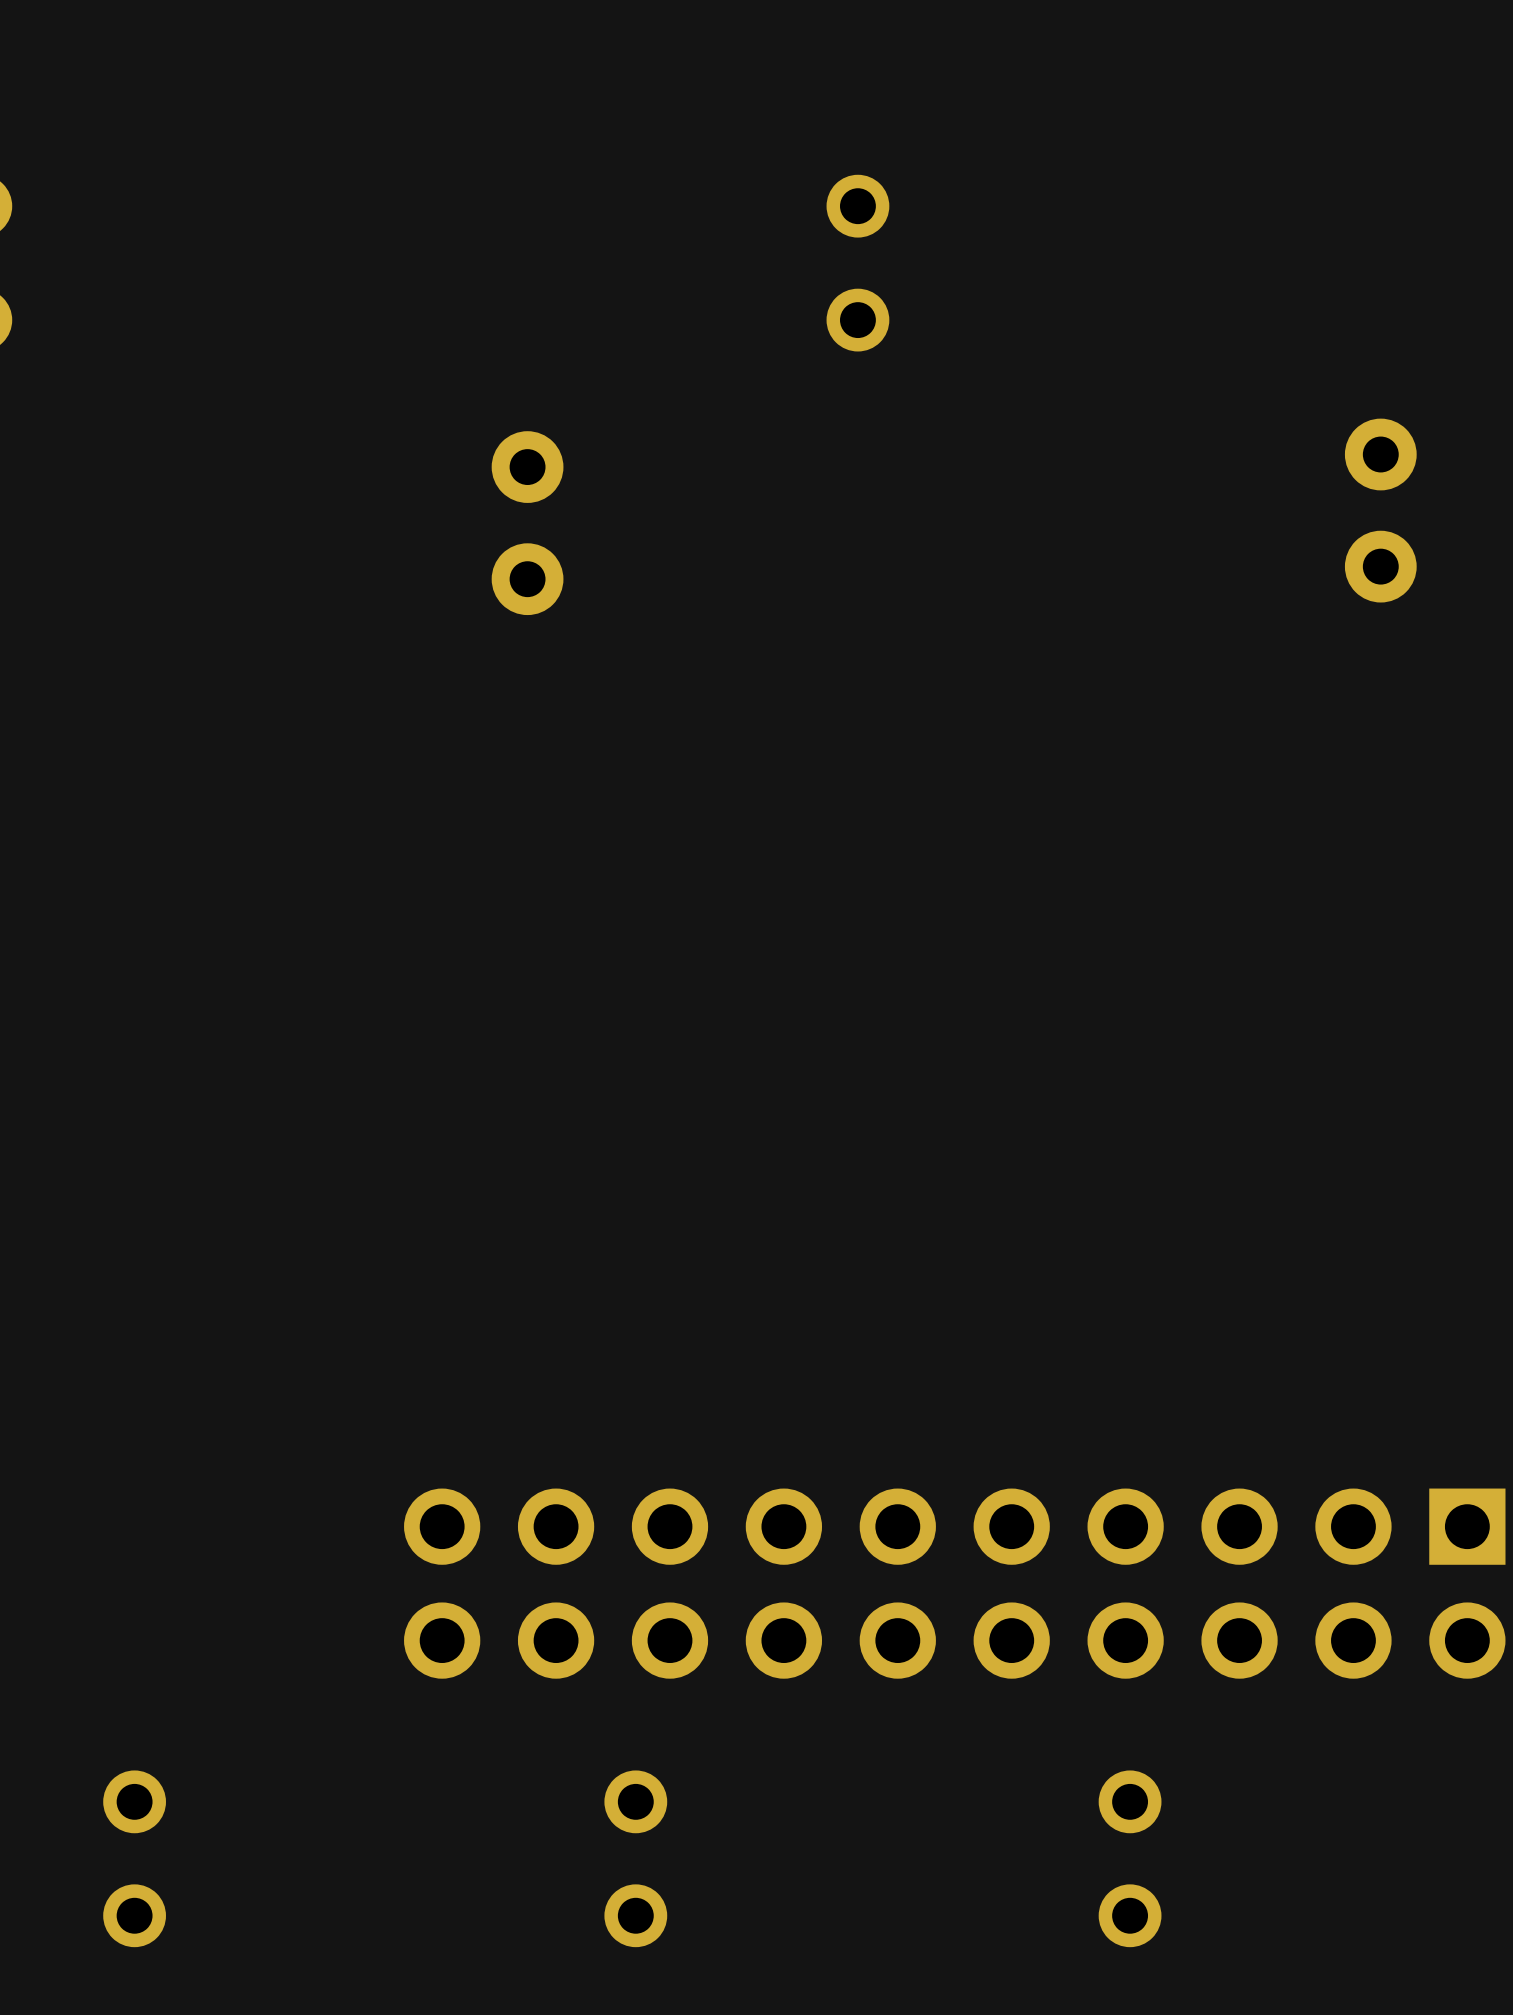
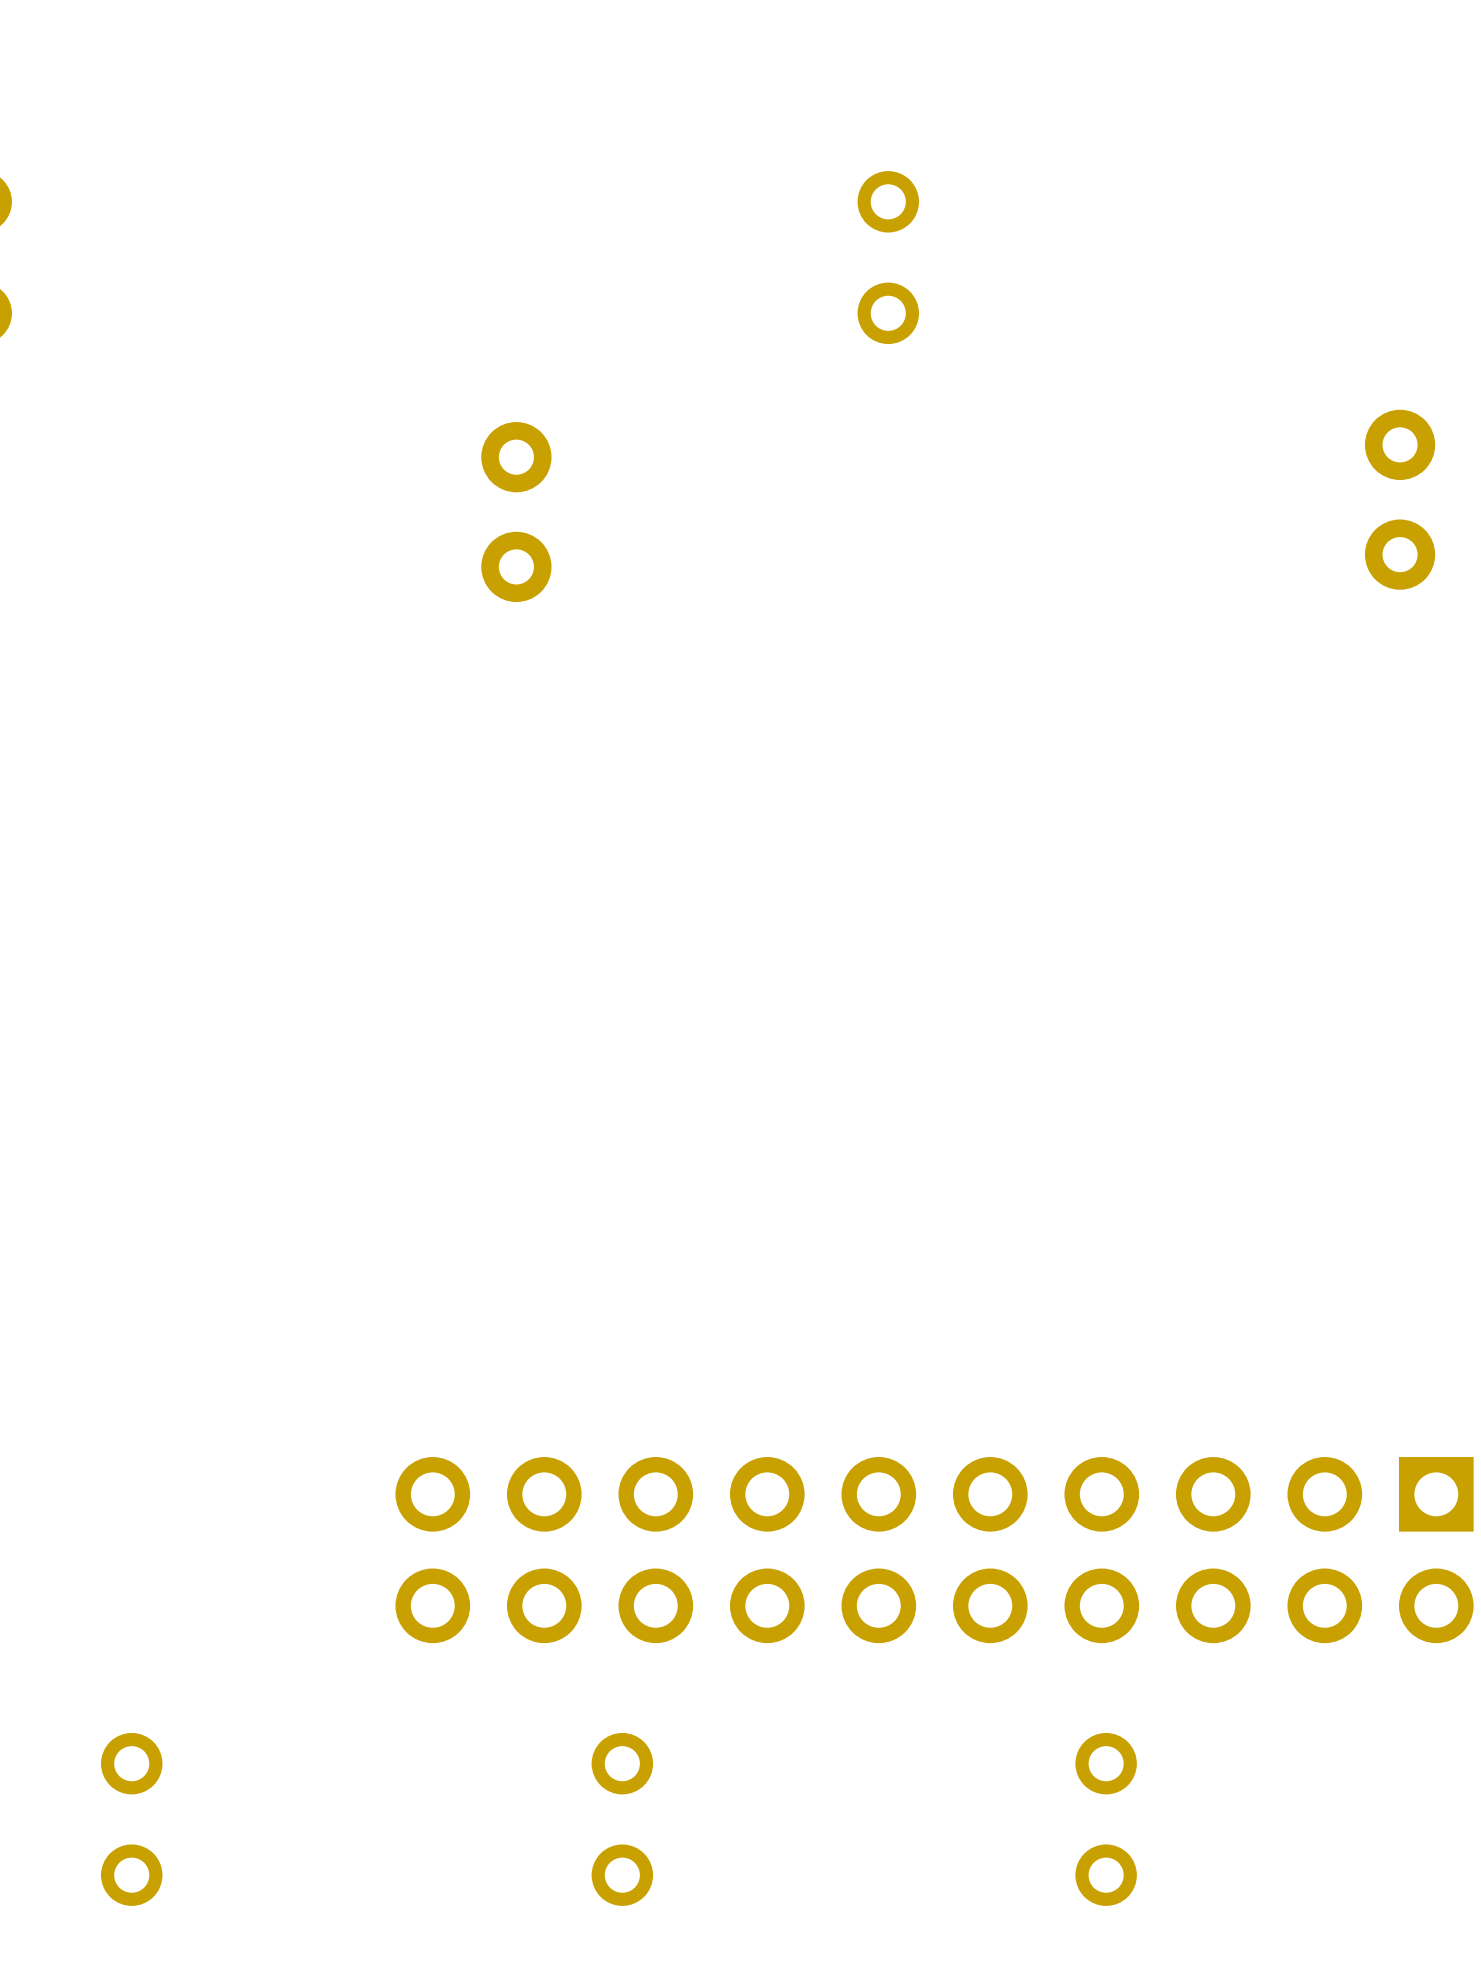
part position: (857, 263) -> (888, 257)
part position: (1380, 510) -> (1400, 499)

